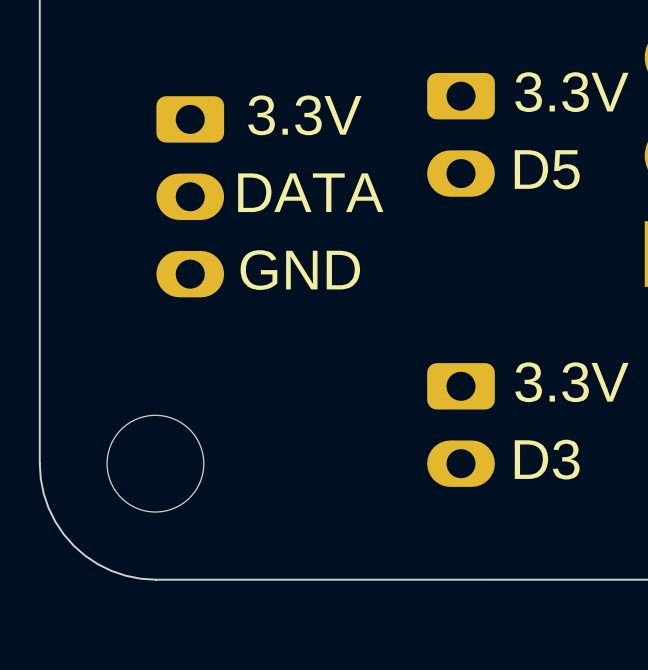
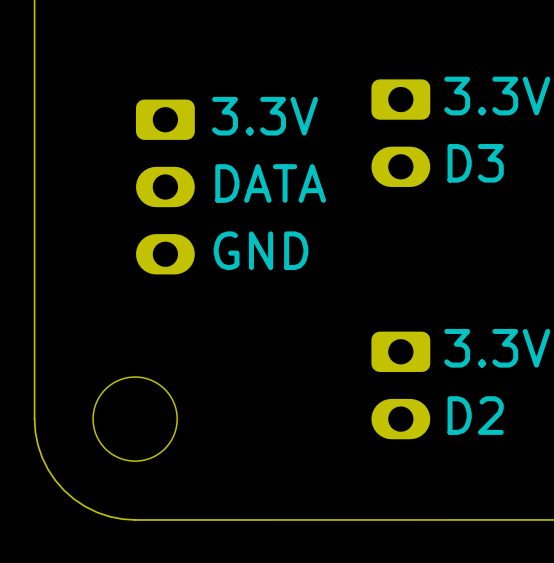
text: D5 (547, 169) -> D3 (475, 163)
text: D3 (547, 459) -> D2 (475, 415)

